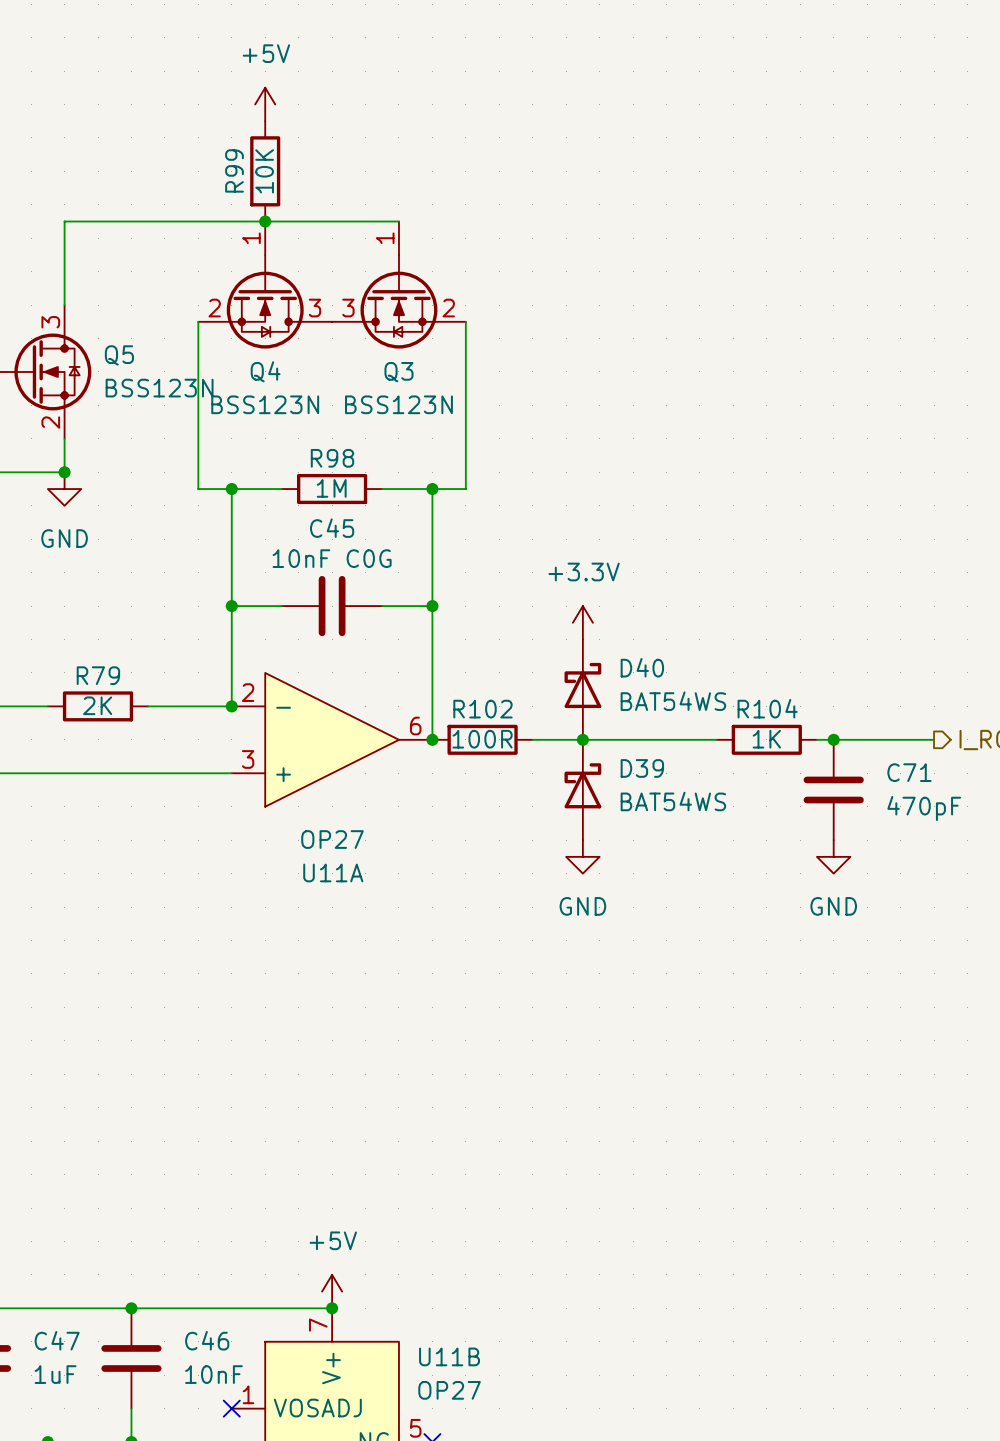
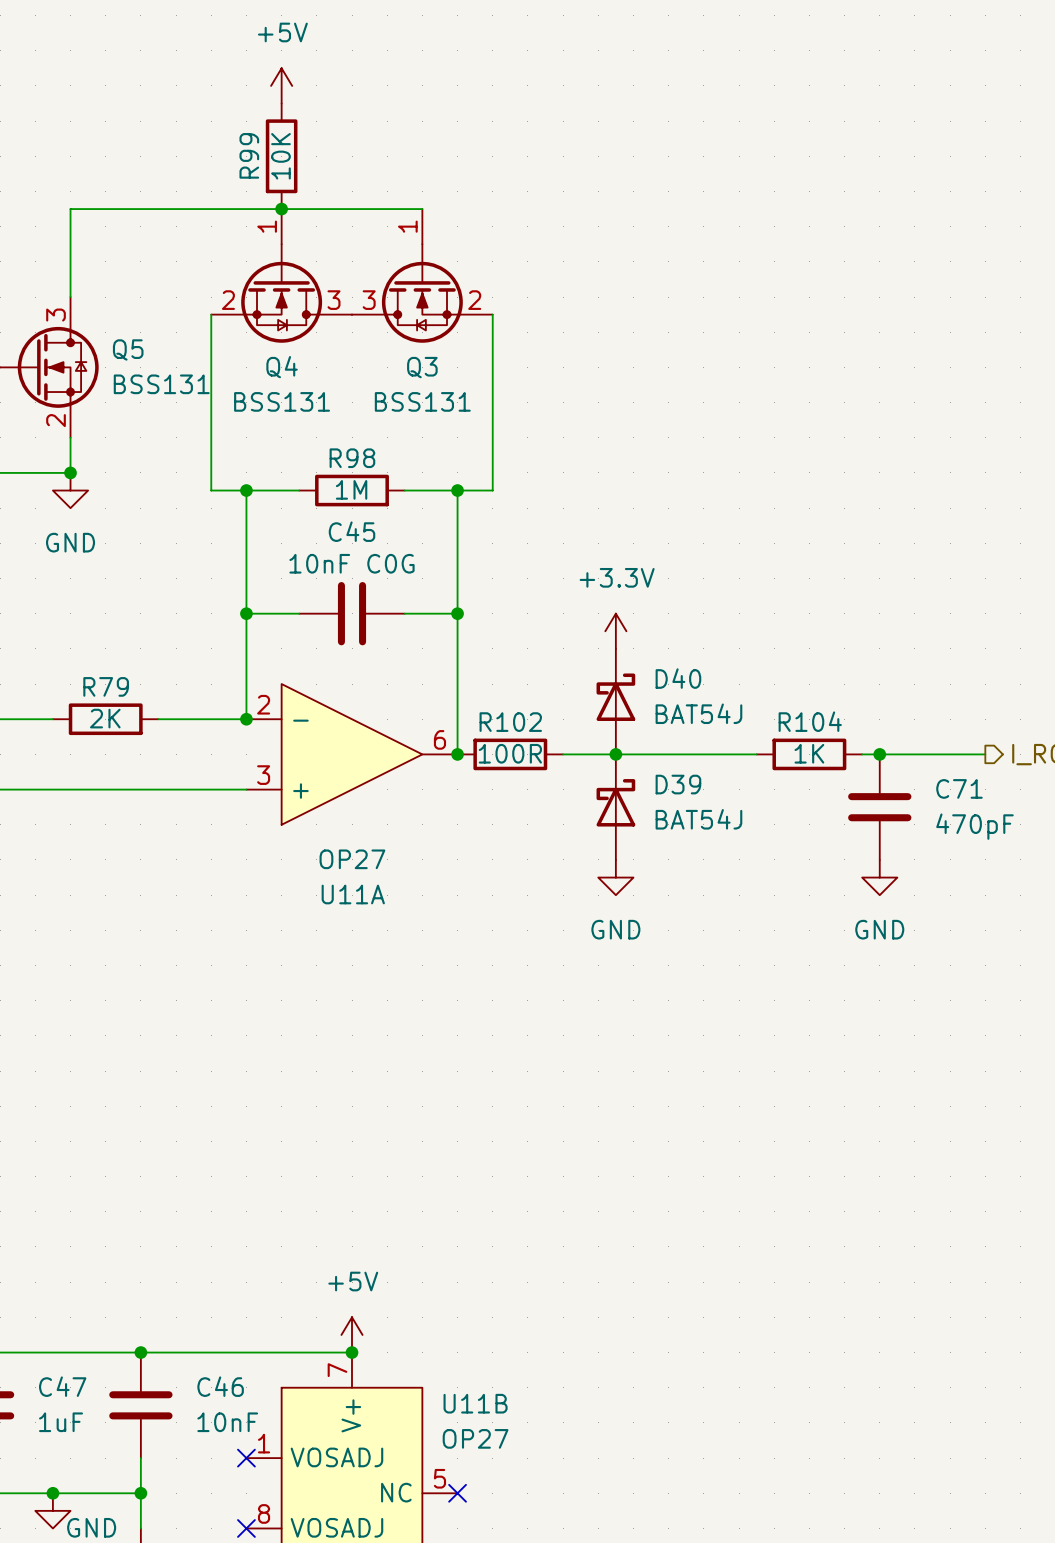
Q5 value: BSS123N (159, 388) -> BSS131 (161, 384)
Q4 value: BSS123N (265, 404) -> BSS131 (282, 401)
Q3 value: BSS123N (398, 404) -> BSS131 (422, 401)
D40 value: BAT54WS (673, 701) -> BAT54J (698, 713)
D39 value: BAT54WS (673, 801) -> BAT54J (698, 819)

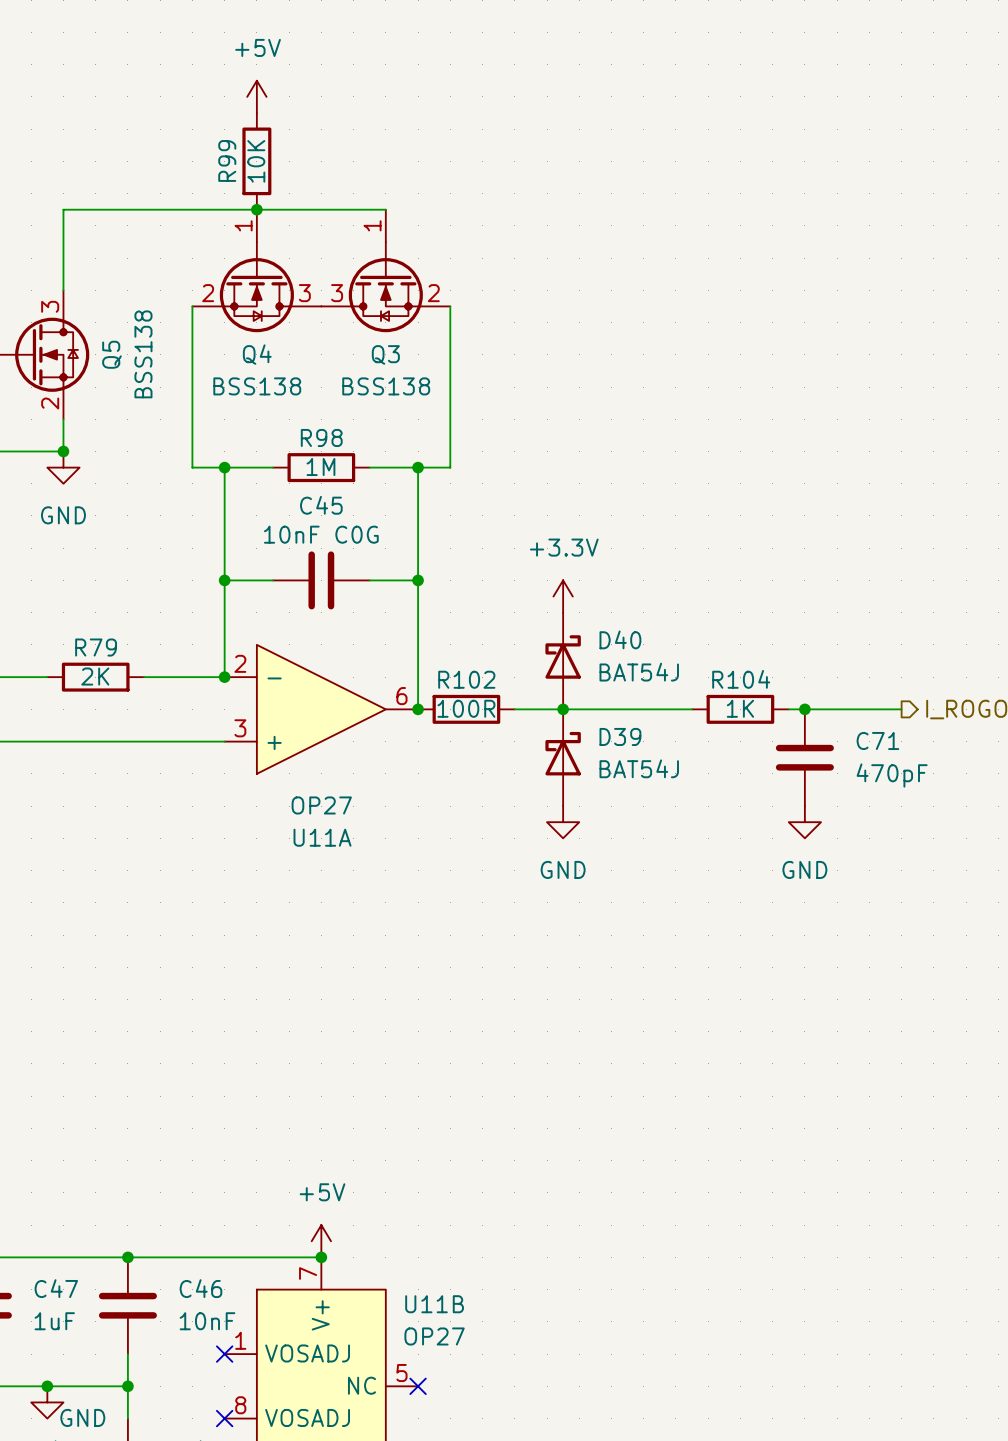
Q5 name rotation: 0° (128, 349) -> 90° counterclockwise (111, 354)
Q5 value: BSS131 (161, 384) -> BSS138 (143, 354)
Q4 value: BSS131 (282, 401) -> BSS138 (257, 386)
Q3 value: BSS131 (422, 401) -> BSS138 (386, 386)

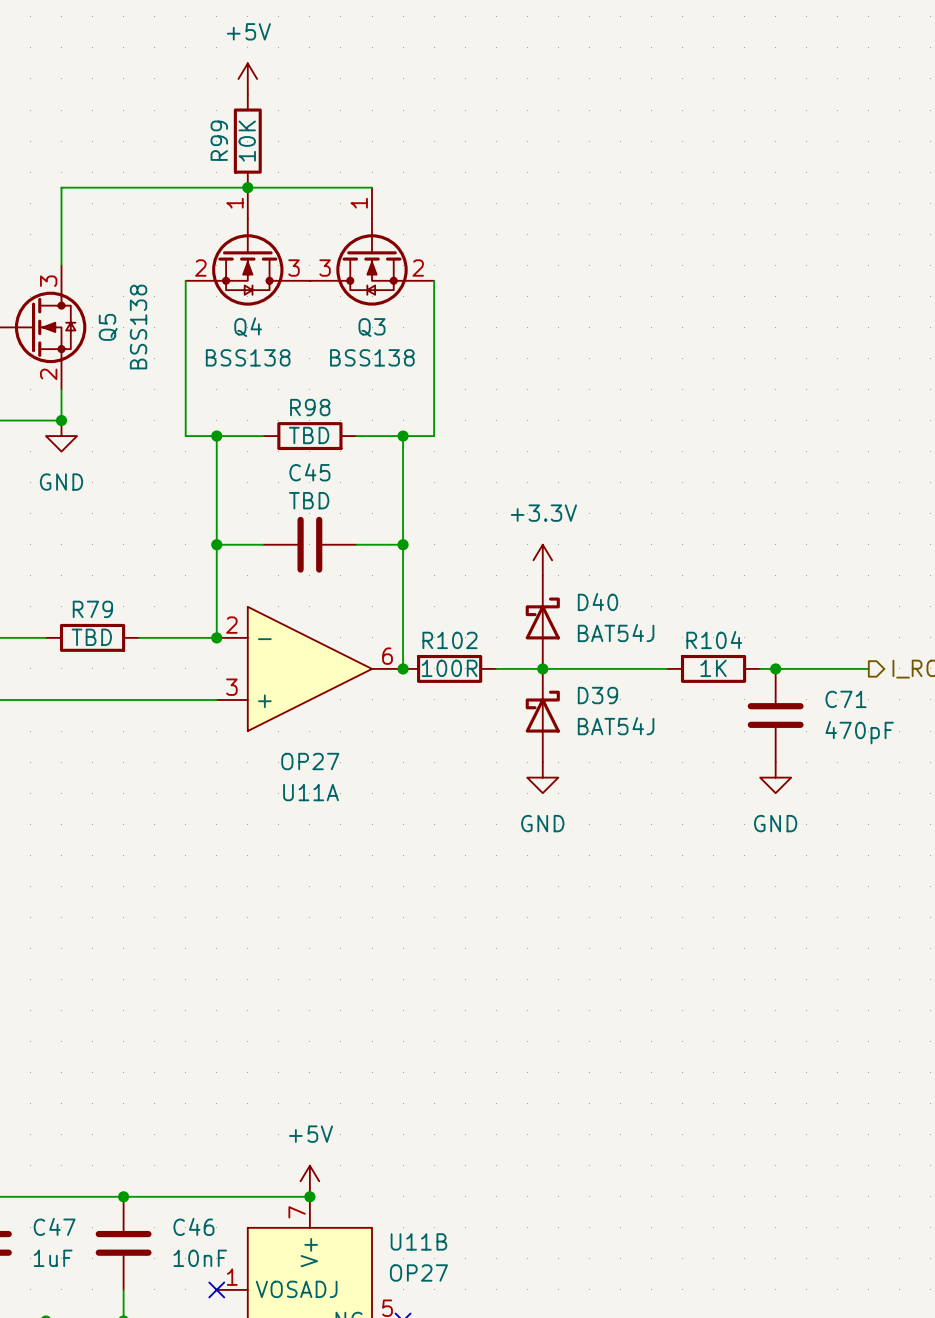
R98 value: 1M (320, 466) -> TBD (309, 435)
C45 value: 10nF C0G (321, 534) -> TBD (309, 500)
R79 value: 2K (95, 676) -> TBD (91, 637)

